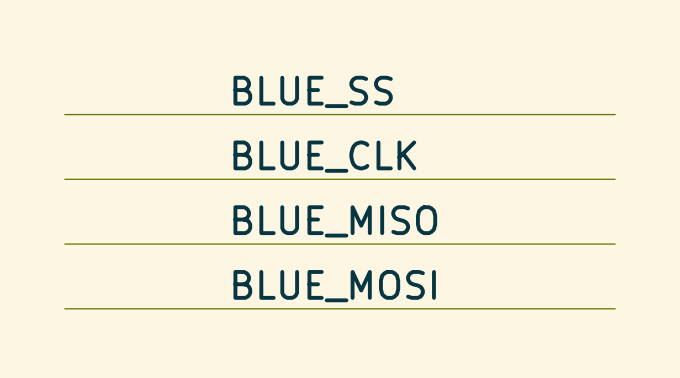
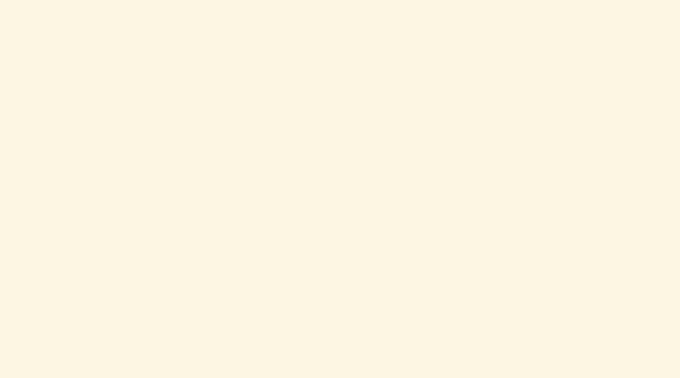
label: BLUE_SS (313, 91) -> none
wire: (64, 114) (615, 114) -> none
label: BLUE_CLK (324, 156) -> none
wire: (64, 179) (615, 179) -> none
label: BLUE_MISO (335, 221) -> none
wire: (64, 244) (615, 244) -> none
label: BLUE_MOSI (334, 286) -> none
wire: (64, 308) (615, 308) -> none

